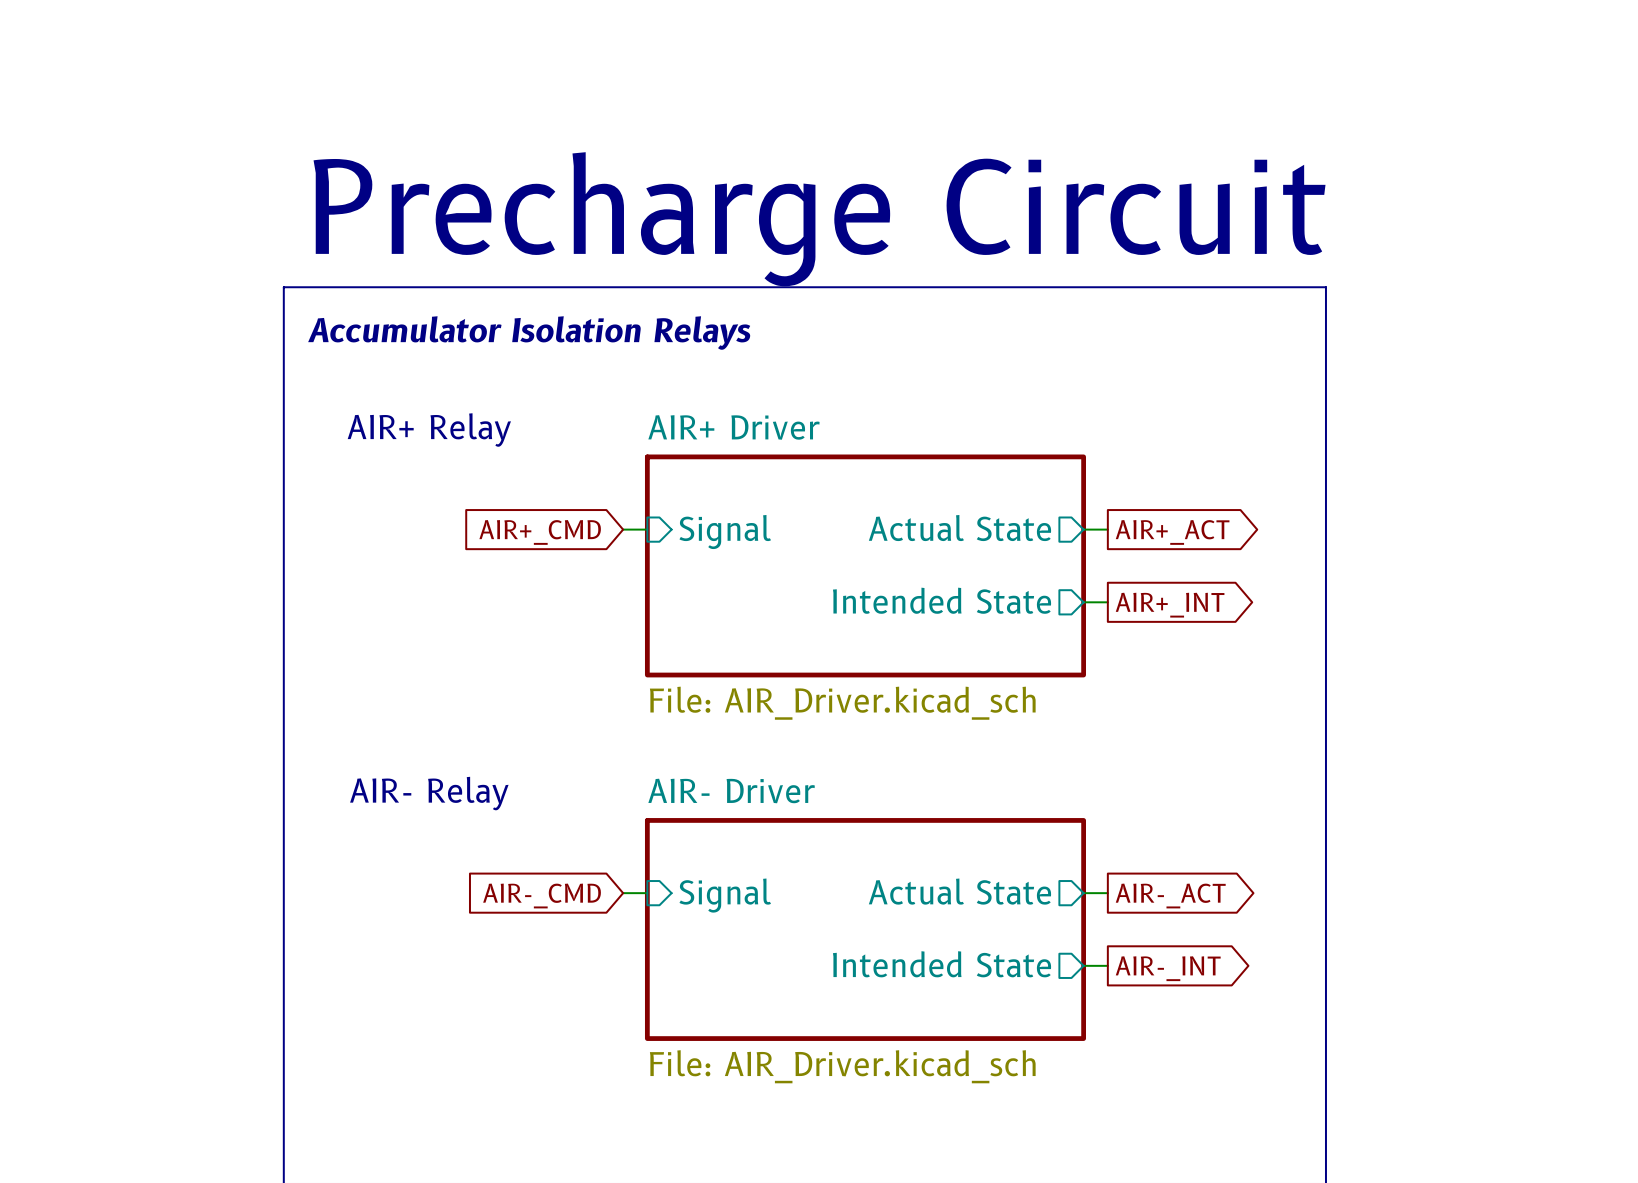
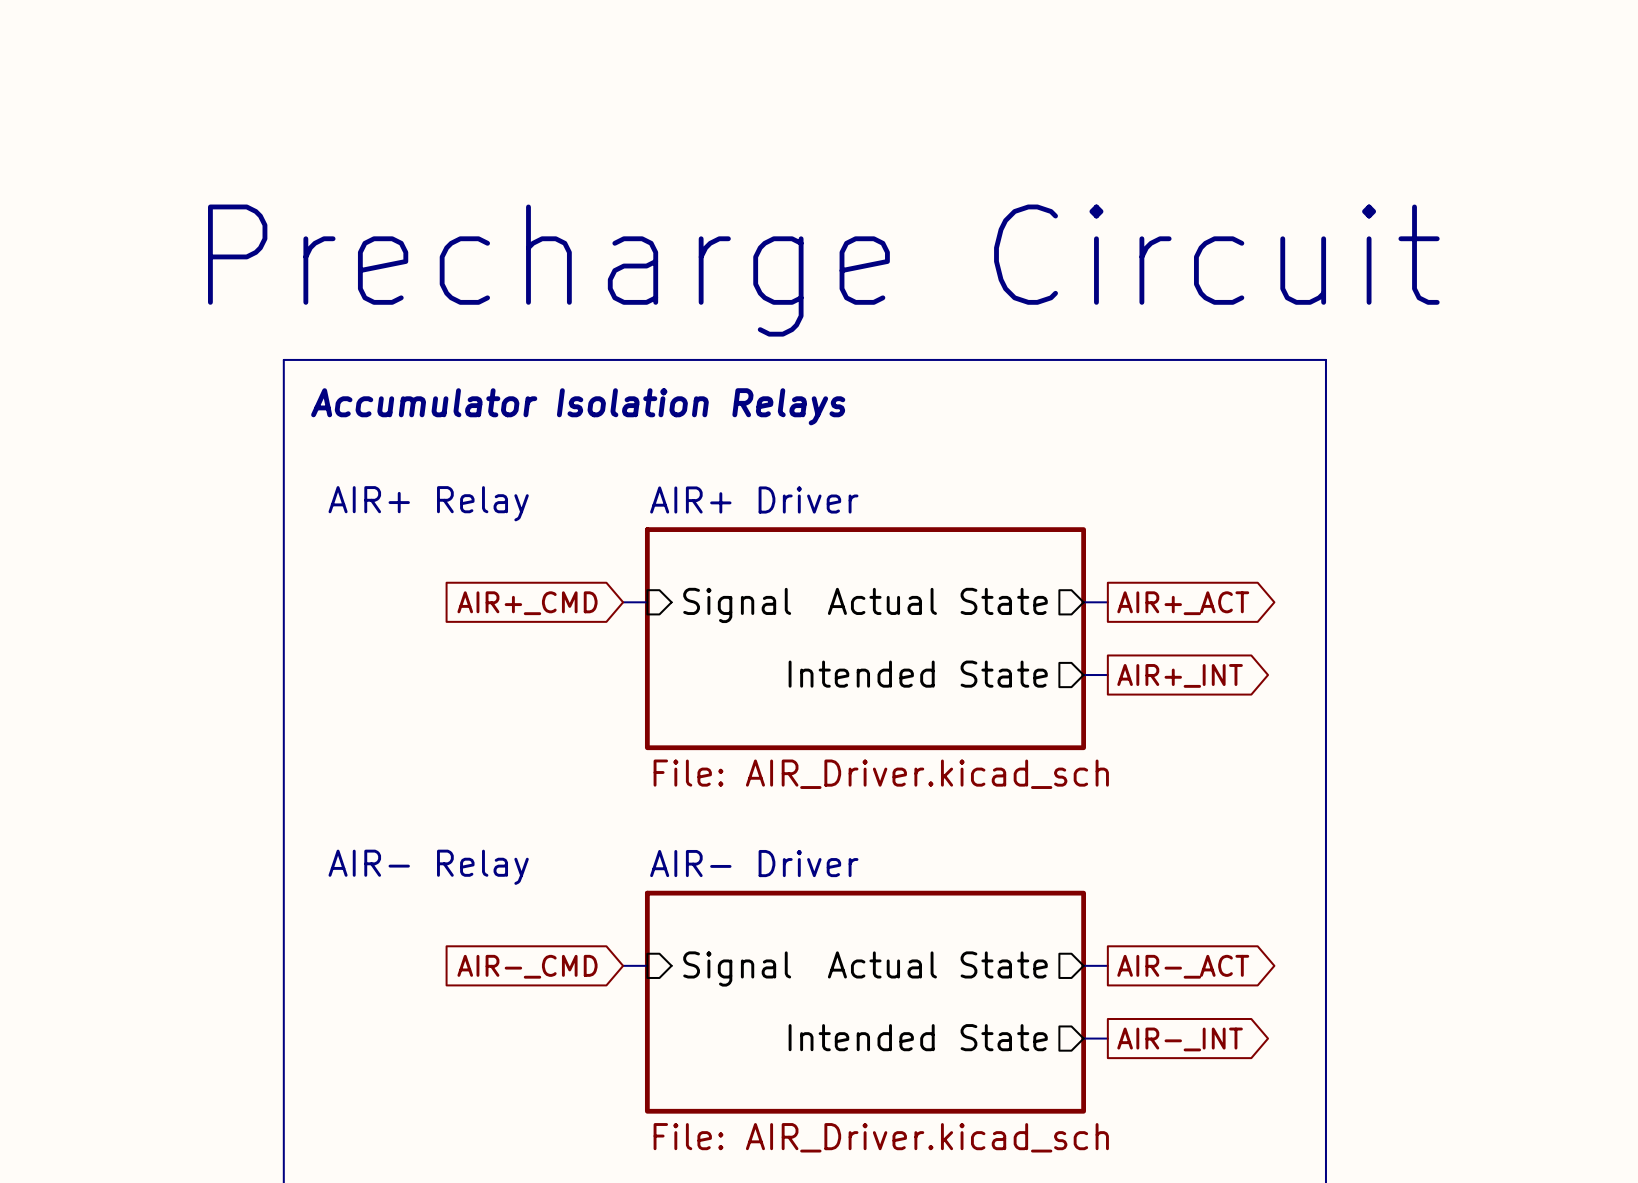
text position: Precharge Circuit (819, 219) -> Precharge Circuit (823, 270)
text position: Accumulator Isolation Relays (529, 333) -> Accumulator Isolation Relays (578, 406)
line: (283, 359) (283, 287) (1325, 287) (1325, 359) -> (283, 359) (1325, 359)
text position: AIR+ Relay (429, 430) -> AIR+ Relay (428, 503)
sheet pin: Actual State (959, 528) -> none
wire: (623, 529) (647, 529) -> (623, 602) (647, 602)
wire: (1083, 529) (1107, 529) -> (1083, 675) (1107, 675)
global label position: AIR+_CMD (540, 532) -> AIR+_CMD (527, 603)
sheet pin position: Signal (725, 532) -> Signal (737, 605)
global label: AIR+_ACT (1172, 532) -> none
sheet AIR+ Driver position: (865, 565) -> (865, 638)
sheet pin: Intended State (942, 600) -> Actual State (937, 601)
global label: AIR+_INT (1170, 605) -> AIR+_ACT (1183, 603)
sheet pin: none -> Intended State (918, 674)
global label: none -> AIR+_INT (1180, 675)
text position: AIR- Relay (429, 793) -> AIR- Relay (428, 867)
sheet pin: Actual State (959, 891) -> none
wire: (623, 893) (647, 893) -> (623, 965) (647, 965)
wire: (1083, 893) (1107, 893) -> (1083, 1038) (1107, 1038)
sheet pin position: Signal (725, 895) -> Signal (737, 968)
global label position: AIR-_CMD (542, 896) -> AIR-_CMD (527, 966)
global label: AIR-_ACT (1170, 896) -> none
sheet AIR- Driver position: (865, 929) -> (865, 1002)
sheet pin: Intended State (942, 964) -> Actual State (937, 964)
global label: AIR-_INT (1168, 968) -> AIR-_ACT (1183, 966)
sheet pin: none -> Intended State (918, 1037)
global label: none -> AIR-_INT (1180, 1039)

